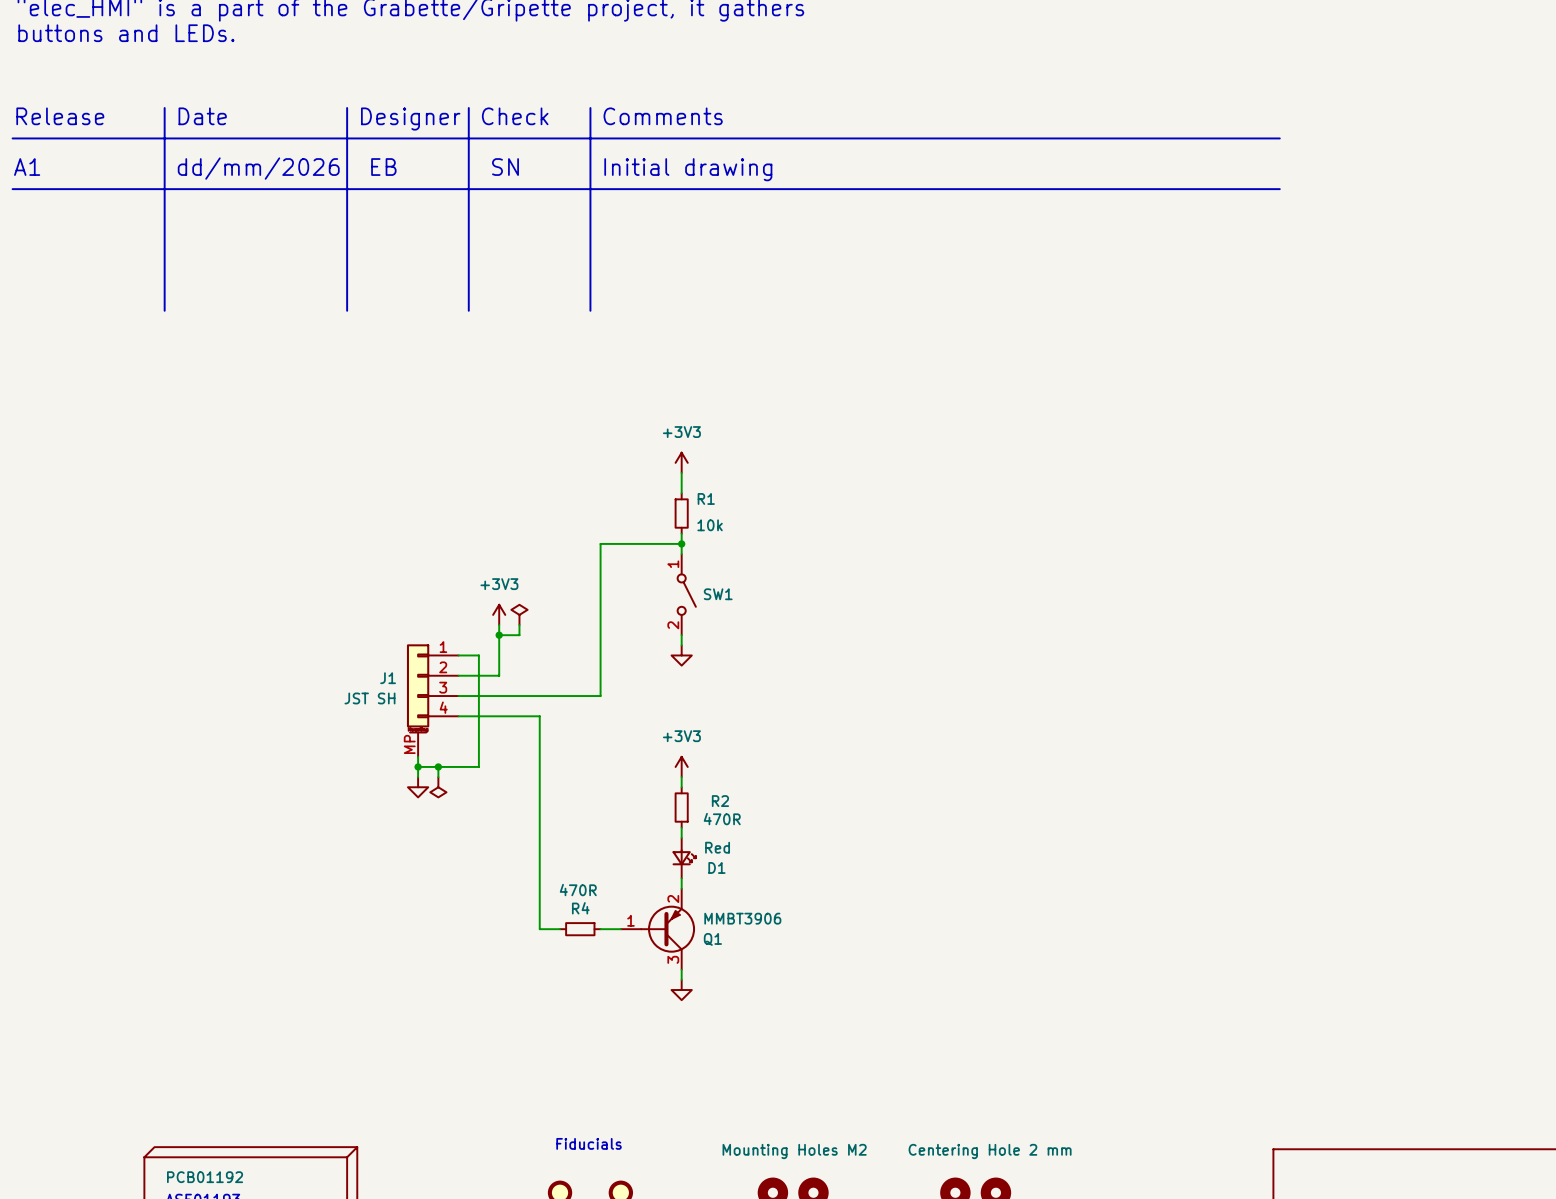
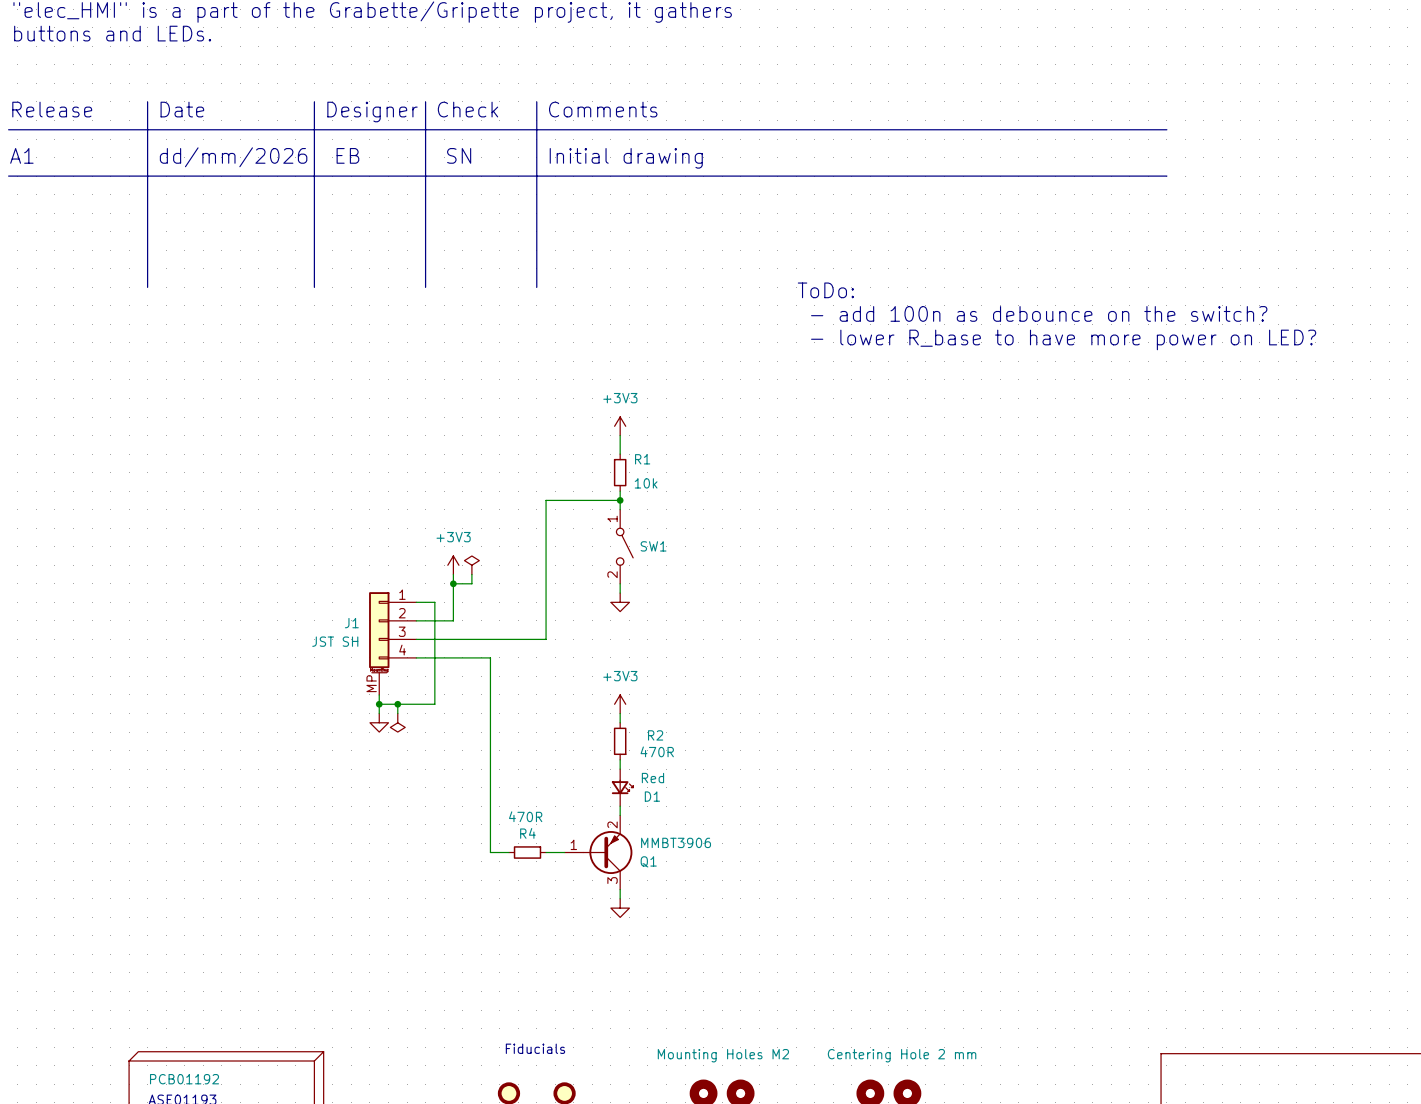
text: none -> ToDo: (825, 290)
text: none -> - add 100n as debounce on the switch? (1039, 313)
text: none -> - lower R_base to have more power on LED? (1063, 339)

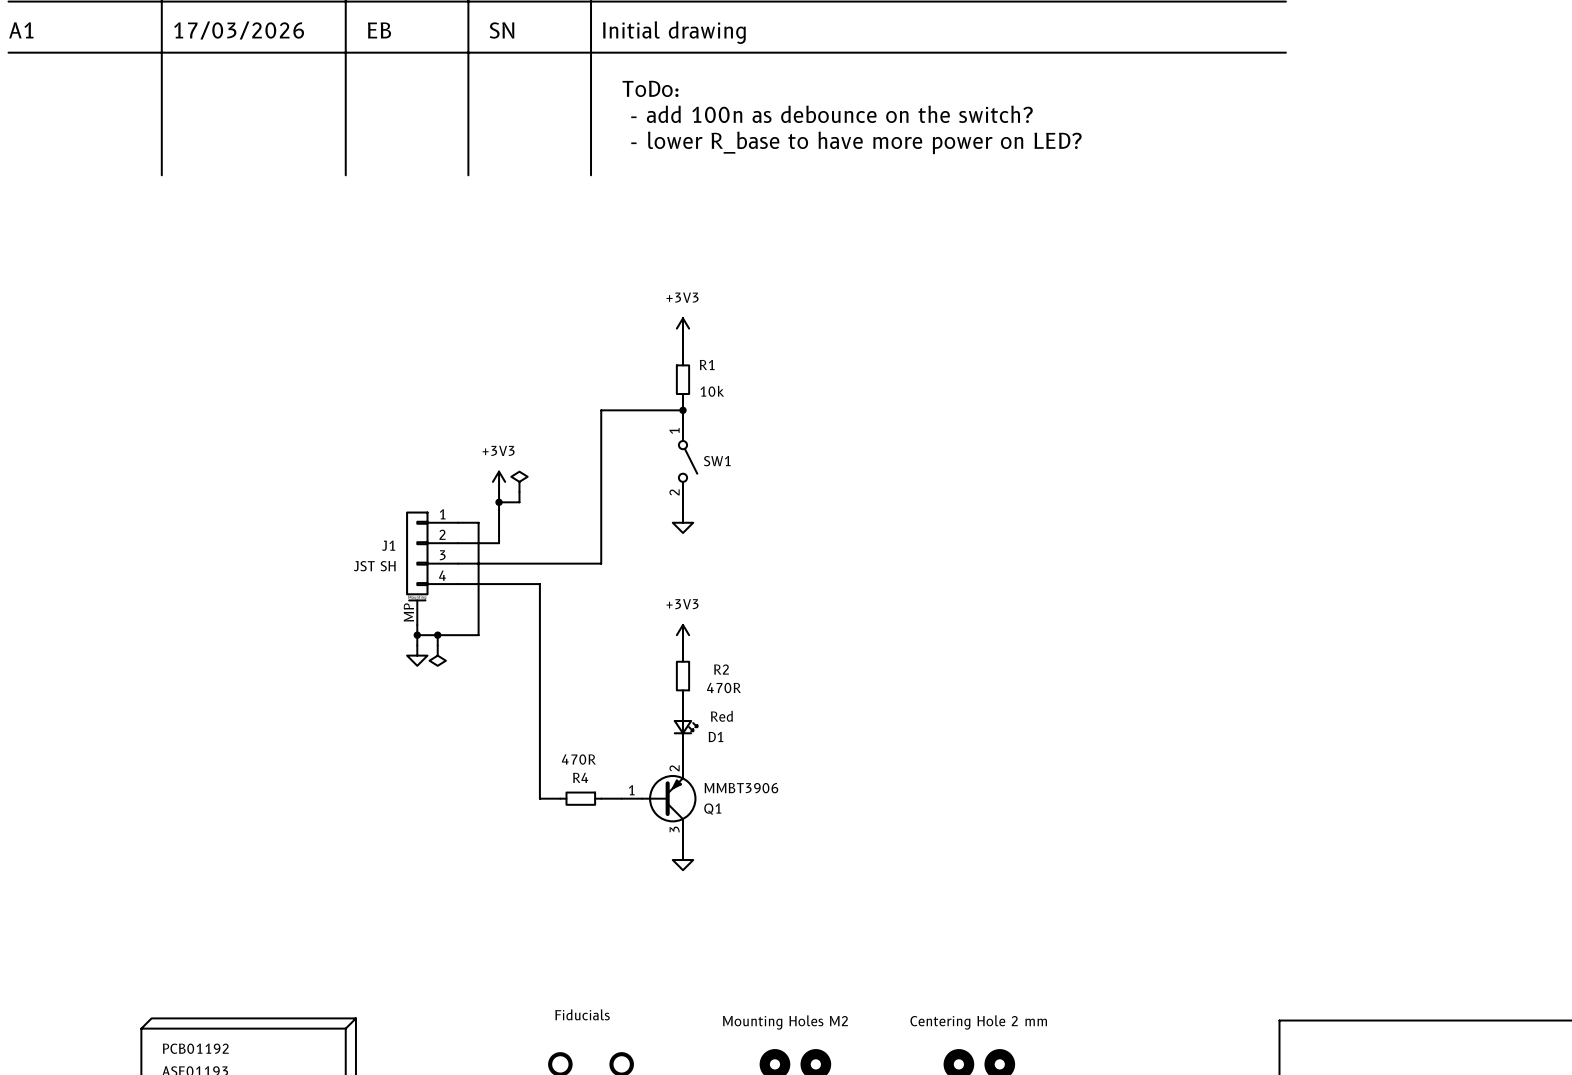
text: dd/mm/2026 (233, 157) -> 17/03/2026 (239, 30)
text: none -> ToDo: (650, 88)
text: none -> - add 100n as debounce on the switch? (832, 114)
text: none -> - lower R_base to have more power on LED? (856, 142)
text: ToDo: (825, 290) -> none
text: - add 100n as debounce on the switch? (1039, 313) -> none
text: - lower R_base to have more power on LED? (1063, 339) -> none

